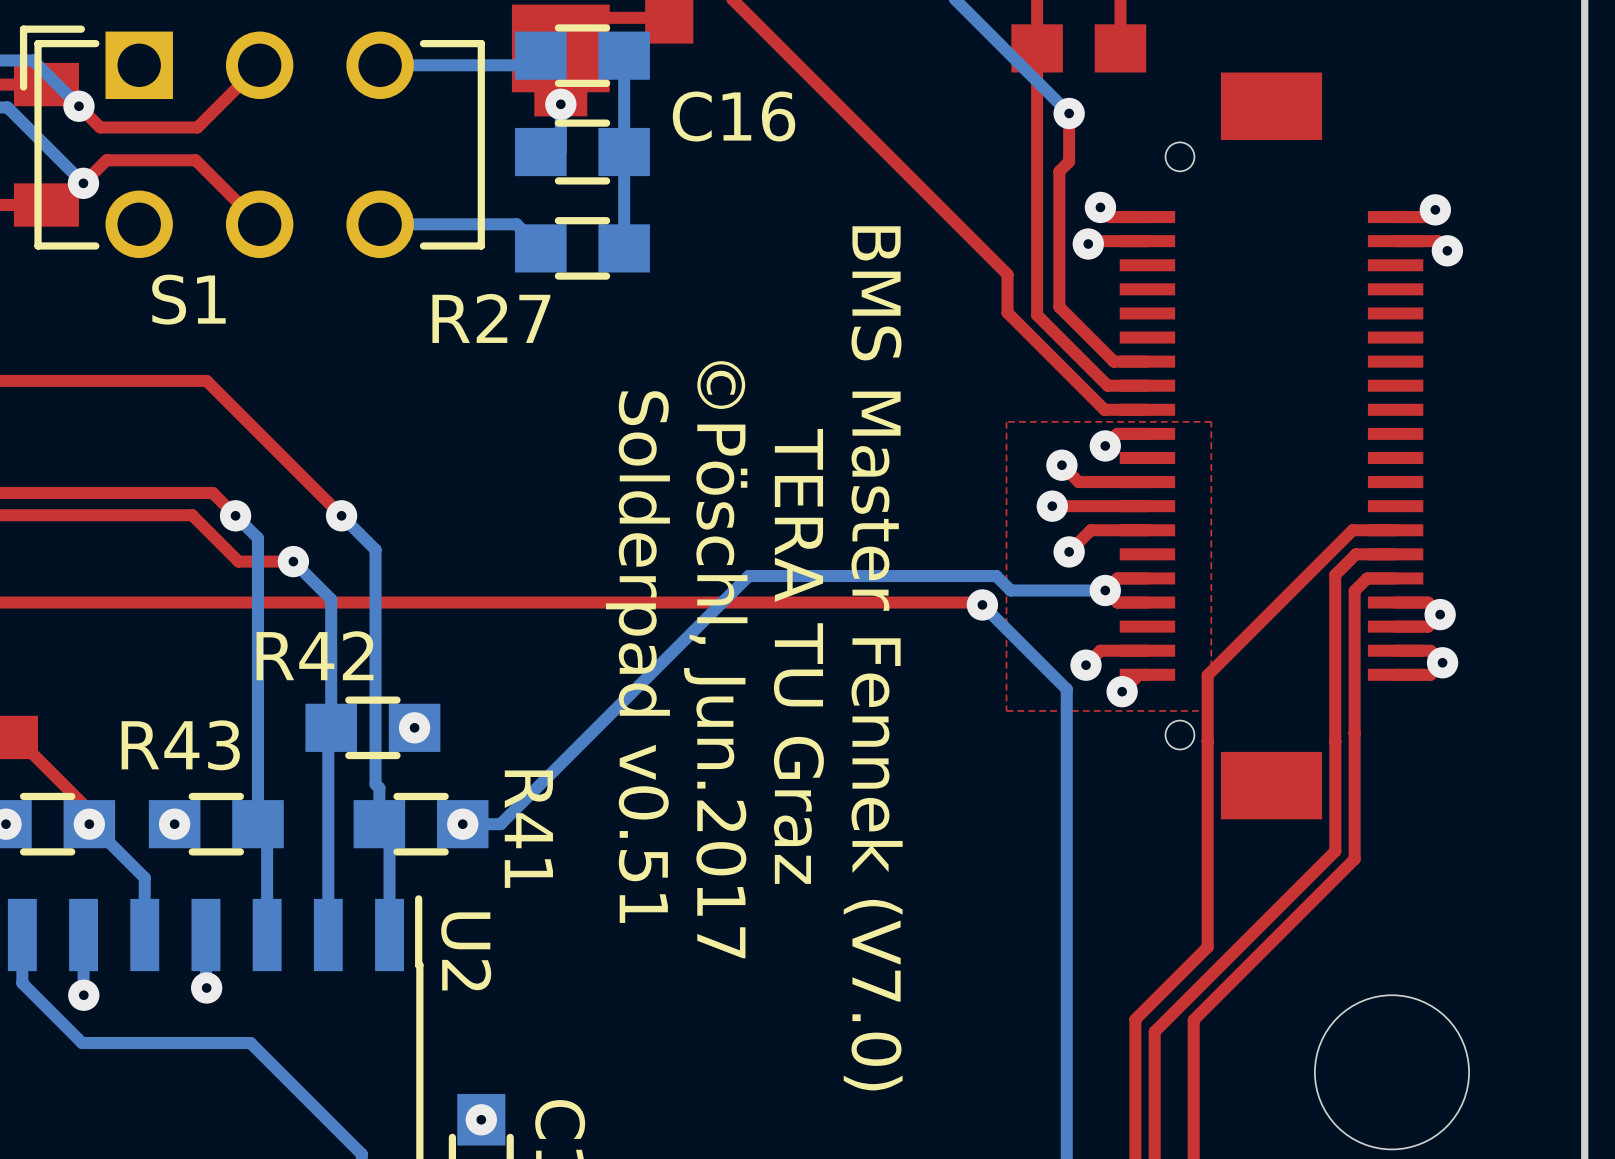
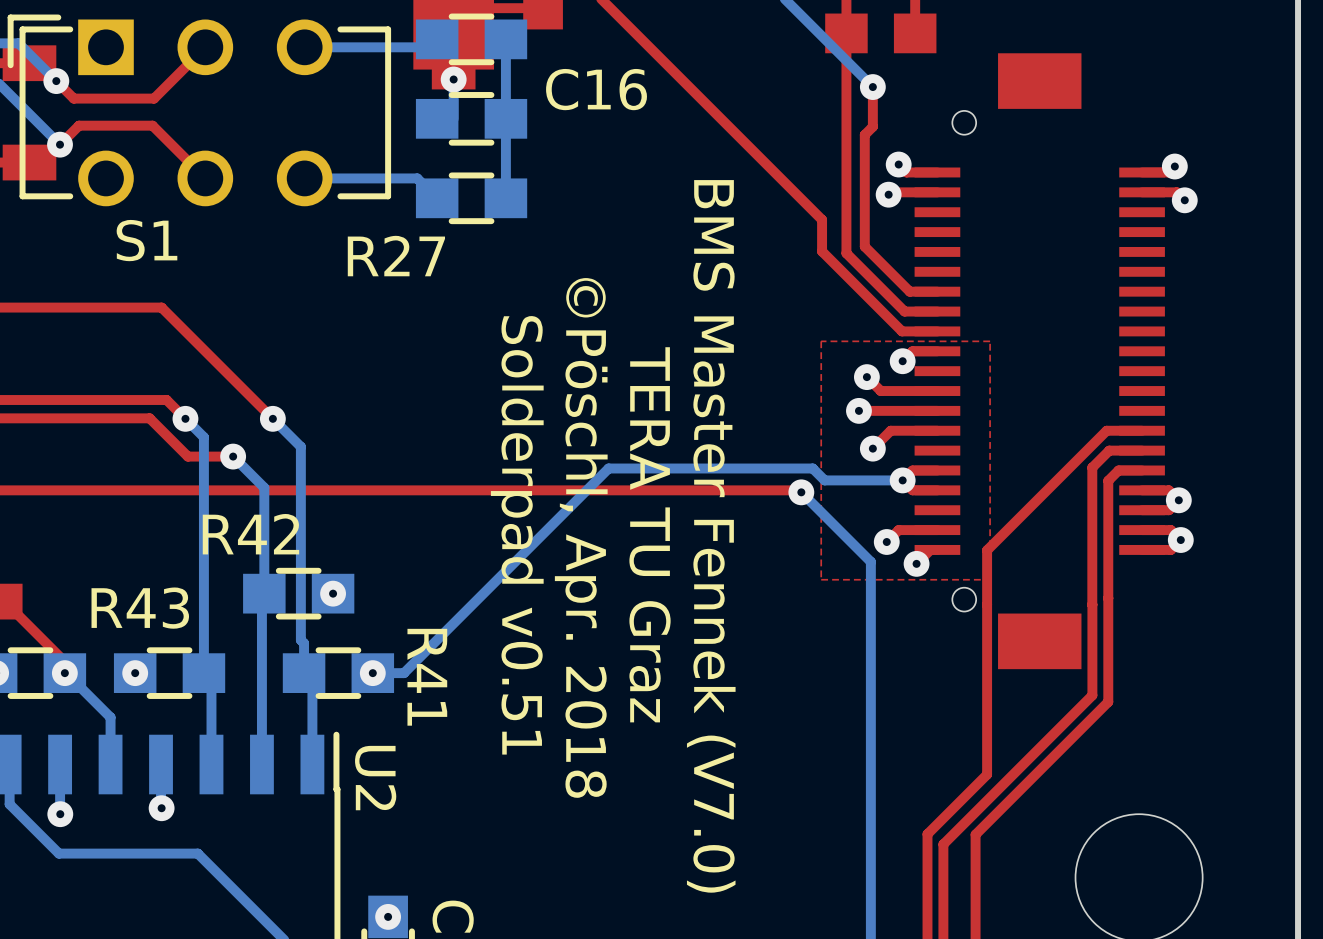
text: ©Pöschl, Jun.2017 (715, 659) -> ©Pöschl, Apr. 2018 (581, 537)

